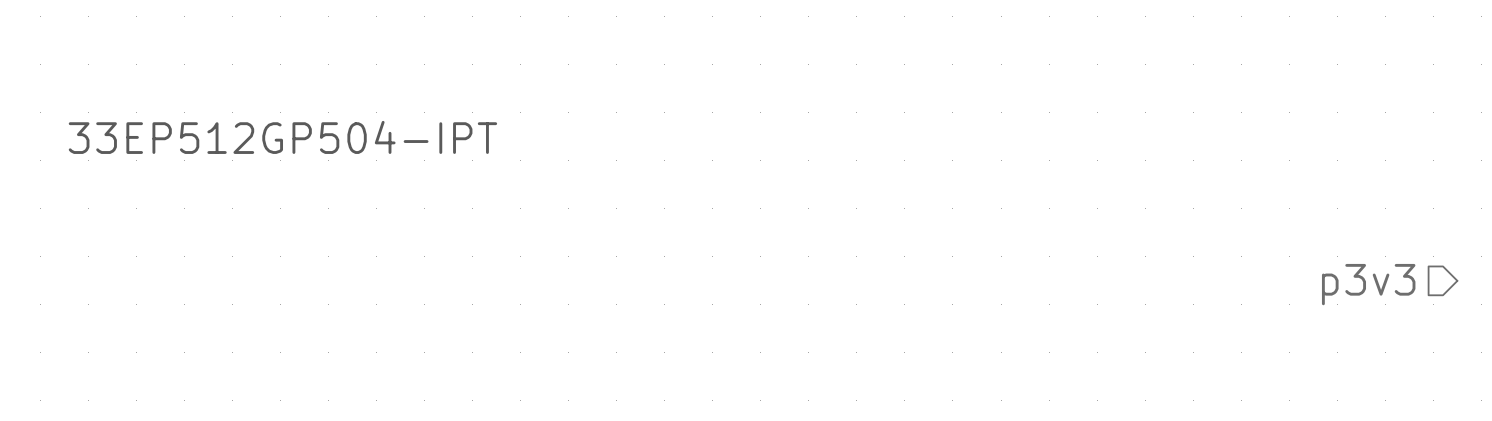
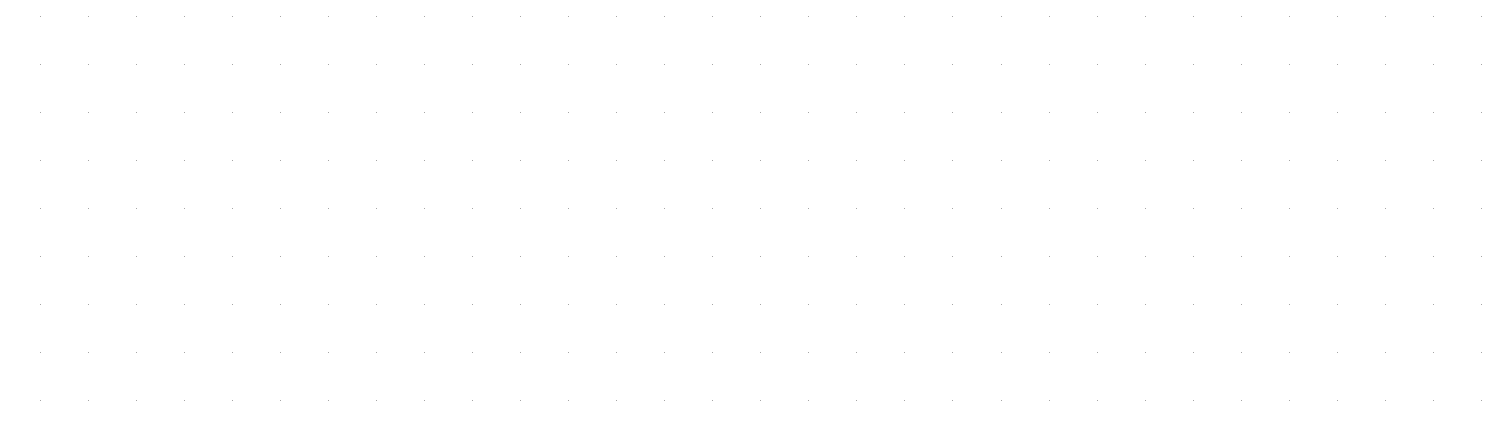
text: 33EP512GP504-IPT (282, 137) -> none
hierarchical label: p3v3 (1368, 284) -> none

